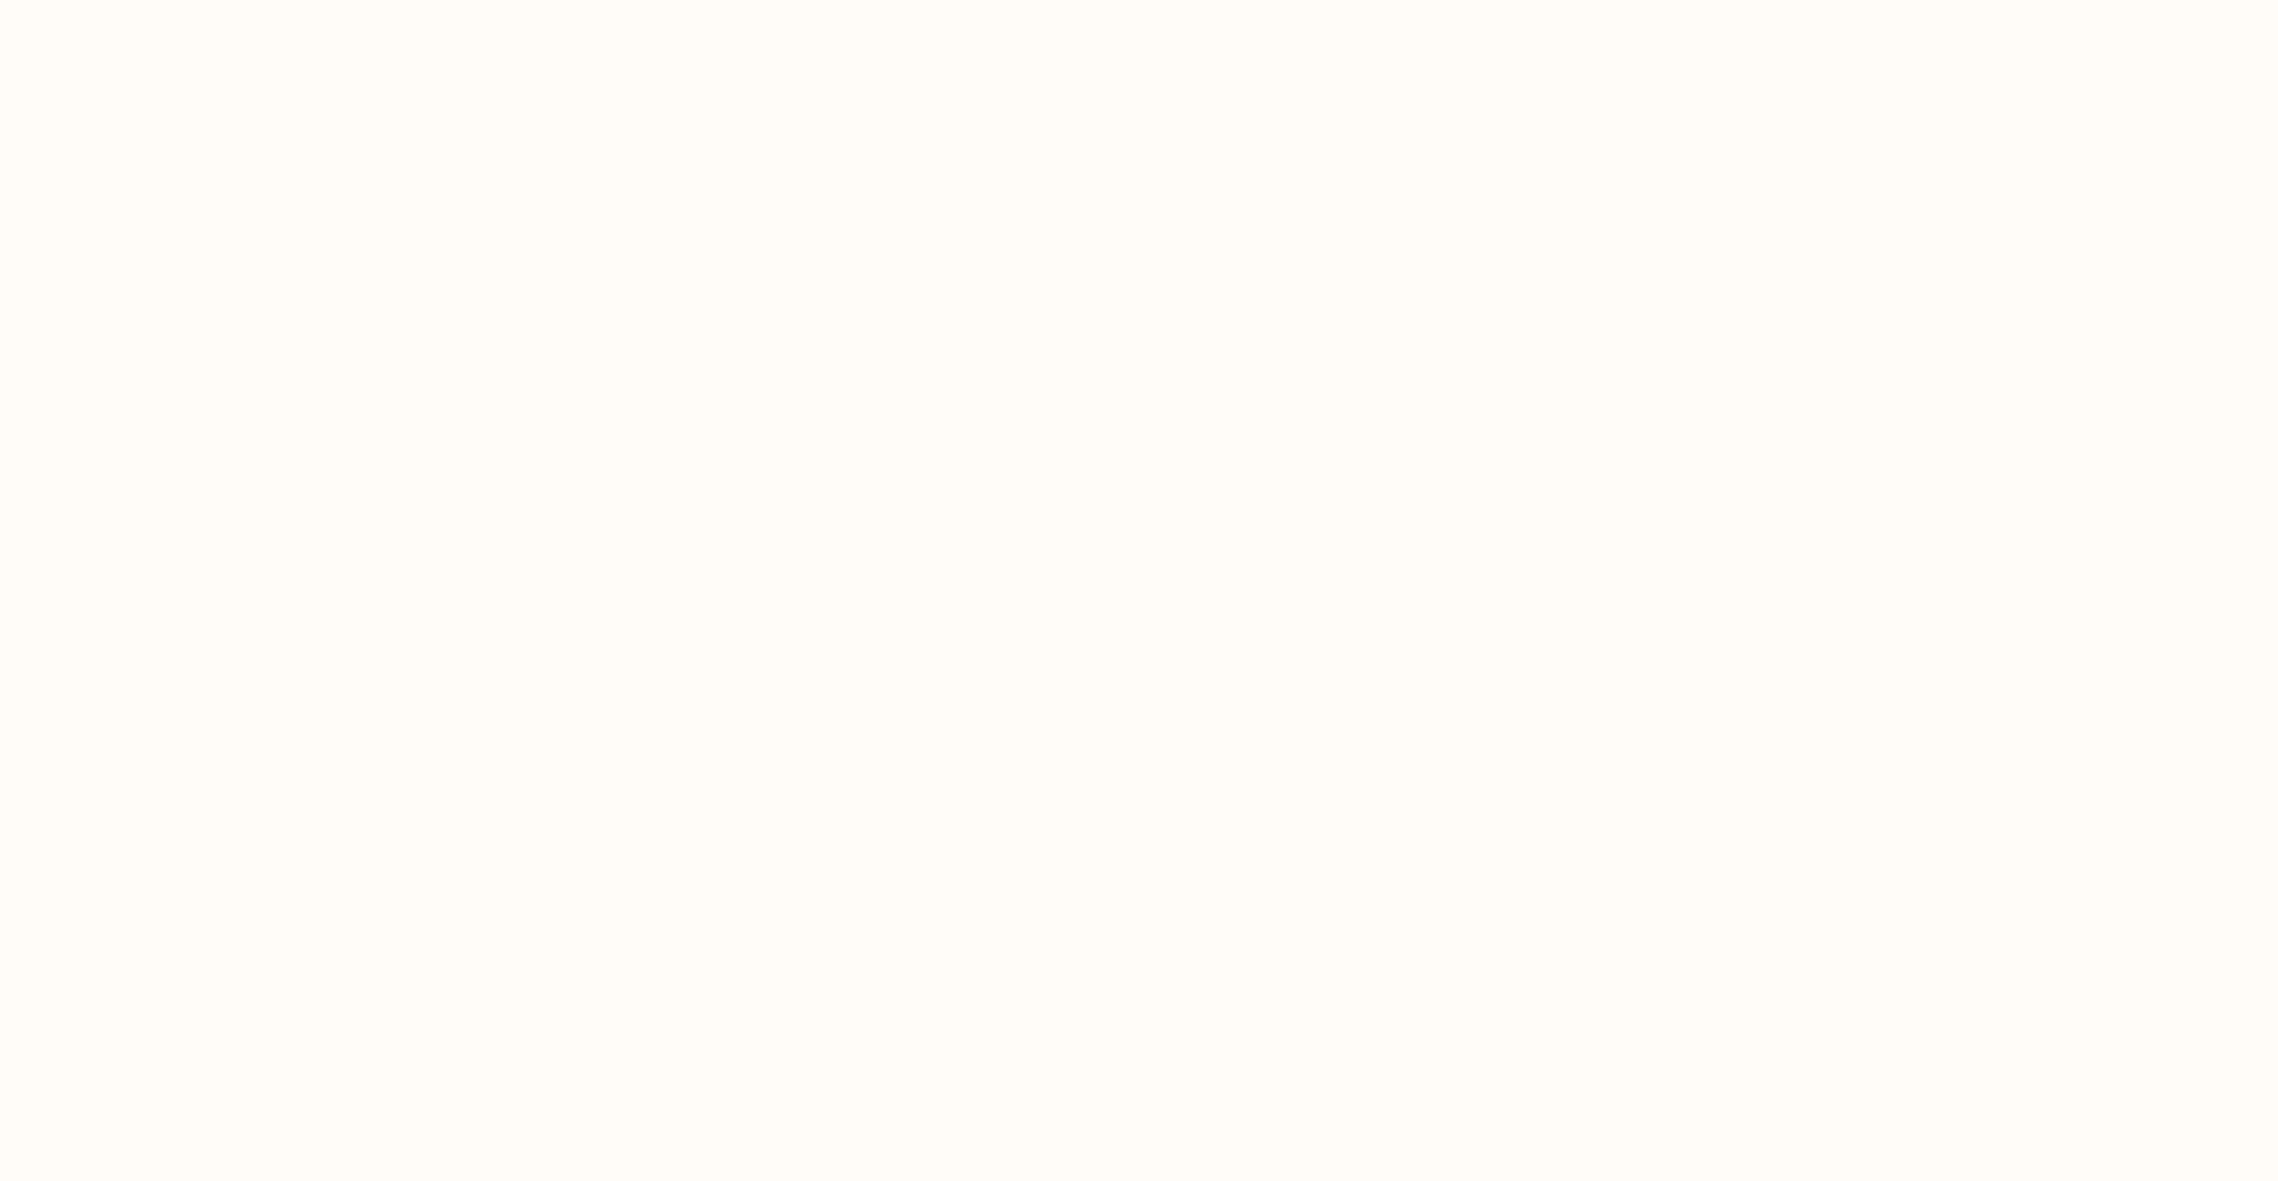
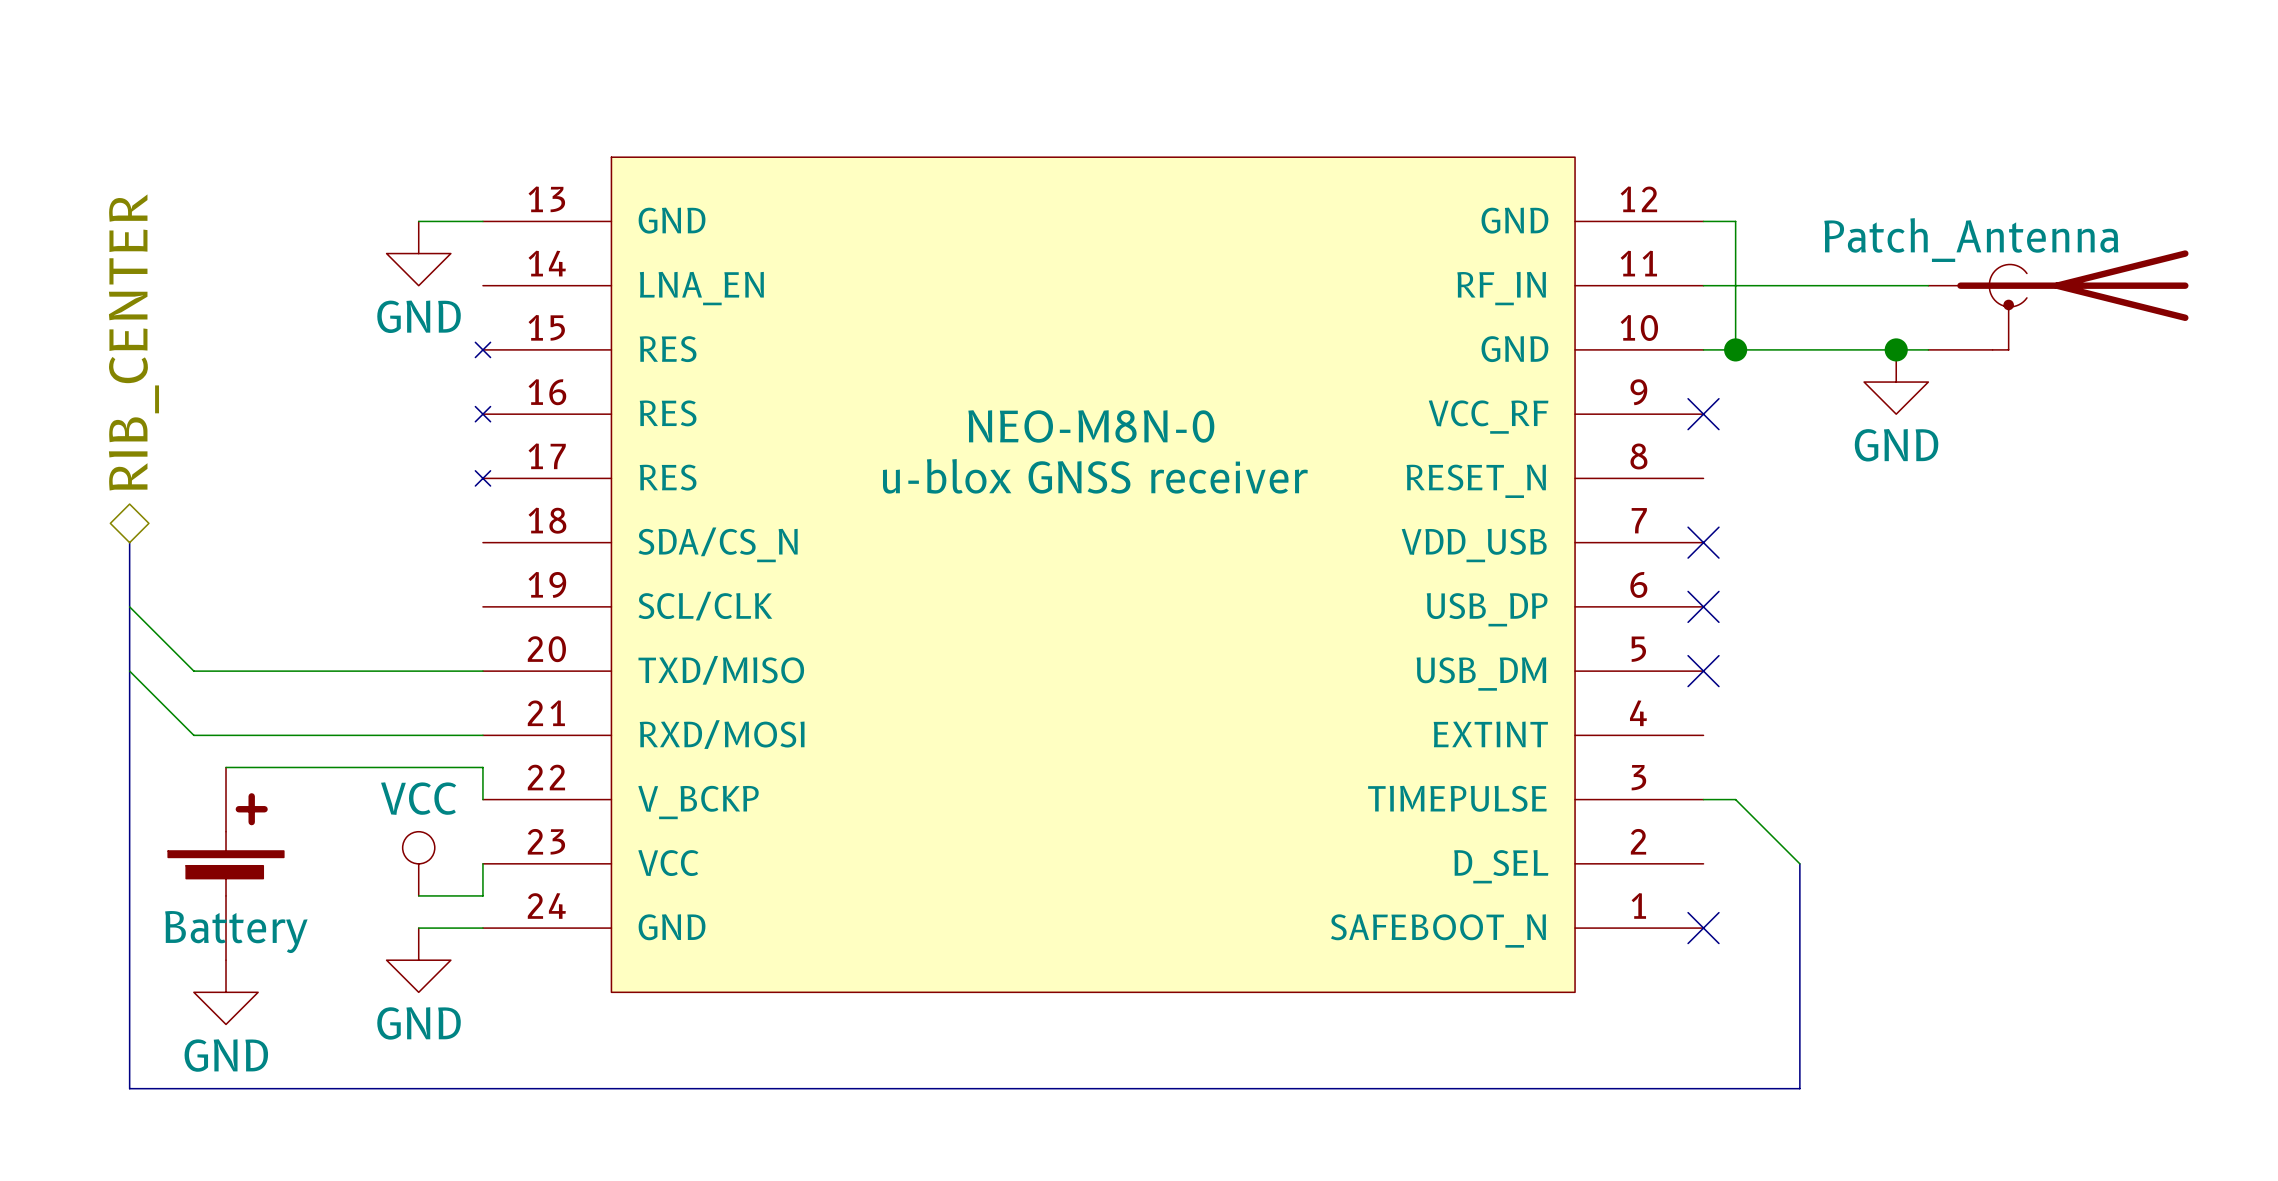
wire: none -> (418, 221) (482, 221)
wire: none -> (1703, 221) (1735, 221) (1735, 349)
power symbol: none -> GND (418, 253)
wire: none -> (1703, 285) (1928, 285)
part: none -> Patch_Antenna (2058, 300)
hierarchical label: none -> RIB_CENTER (133, 342)
wire: none -> (1703, 349) (1928, 349)
junction: none -> (1735, 349)
junction: none -> (1896, 349)
power symbol: none -> GND (1896, 382)
no-connect mark: none -> (1703, 414)
bus: none -> (129, 542) (129, 1088) (1799, 1088) (1799, 863)
no-connect mark: none -> (1703, 542)
part: none -> NEO-M8N-0 (1089, 574)
wire: none -> (129, 606) (193, 671) (482, 671)
no-connect mark: none -> (1703, 606)
wire: none -> (129, 671) (193, 735) (482, 735)
no-connect mark: none -> (1703, 671)
wire: none -> (226, 767) (482, 767) (482, 799)
wire: none -> (1703, 799) (1735, 799) (1799, 863)
part: none -> Battery (226, 863)
power symbol: none -> VCC (418, 863)
wire: none -> (482, 863) (482, 895) (418, 895)
wire: none -> (418, 928) (482, 928)
no-connect mark: none -> (1703, 928)
power symbol: none -> GND (418, 960)
power symbol: none -> GND (226, 992)

